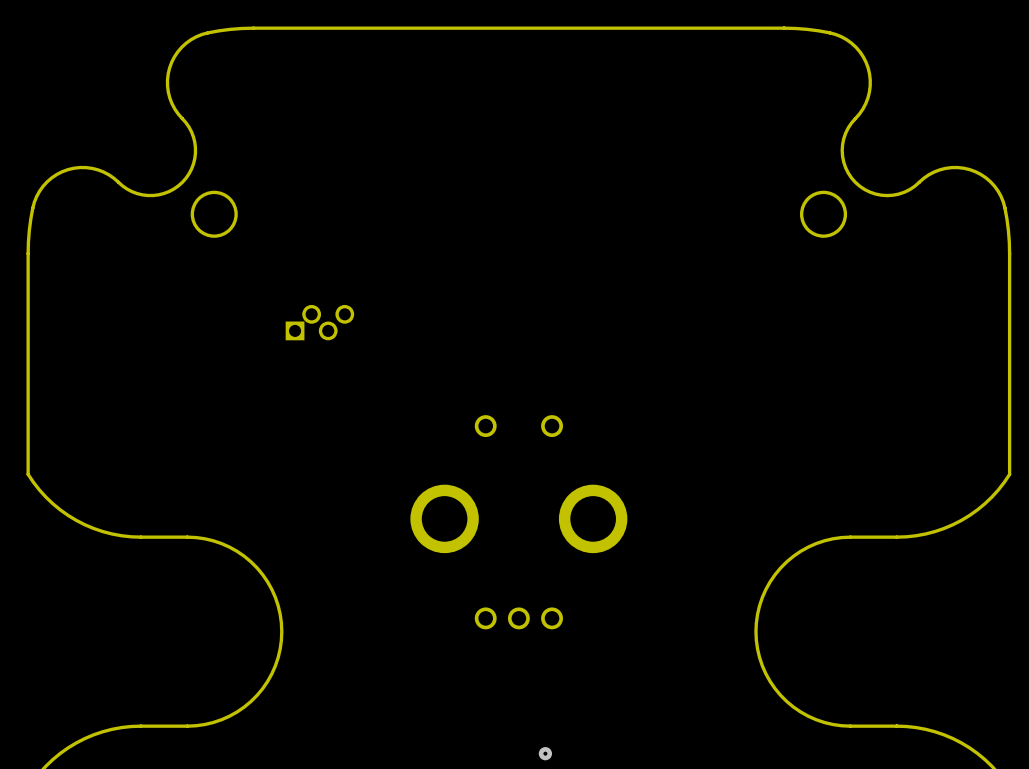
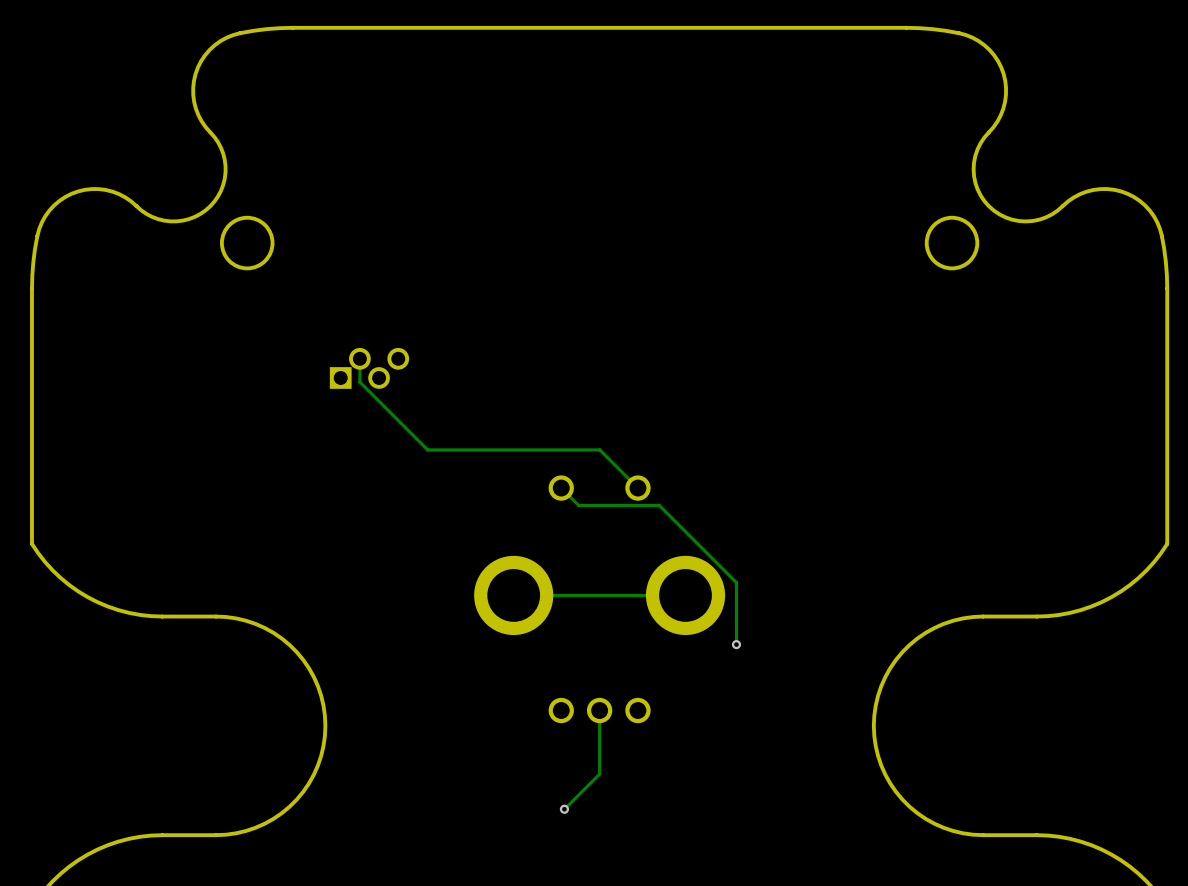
track: none -> (359, 358) (359, 382) (427, 449) (599, 449) (637, 488)
track: none -> (561, 488) (578, 505) (659, 505) (736, 582) (736, 644)
track: none -> (685, 595) (513, 595)
via: none -> (736, 644)
track: none -> (599, 710) (599, 774) (564, 809)
via: none -> (564, 809)
via: (545, 753) -> none

